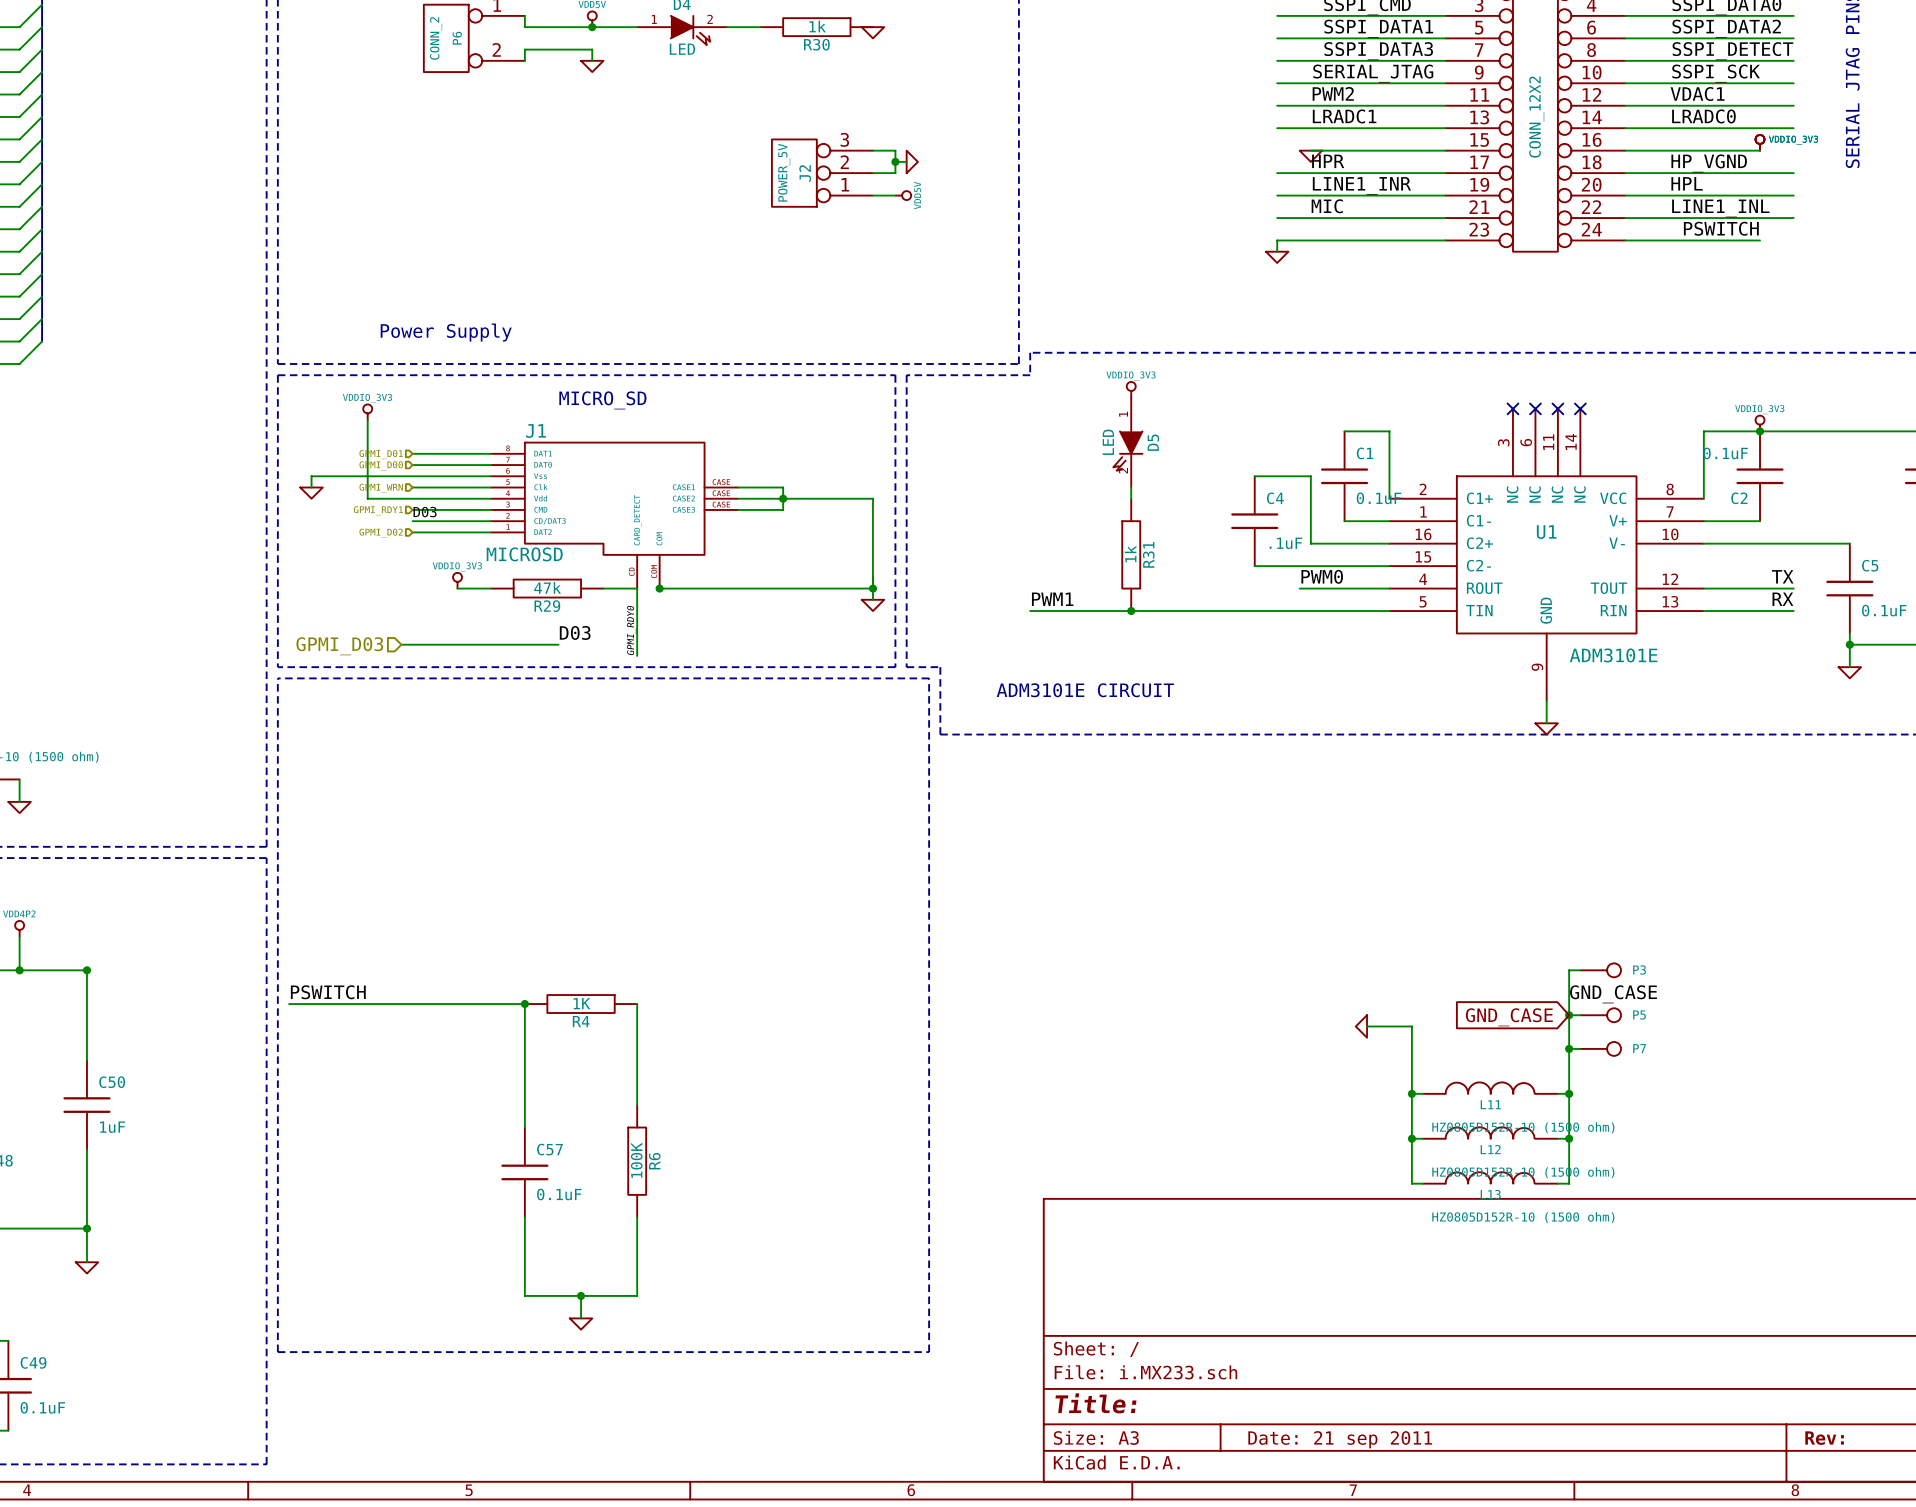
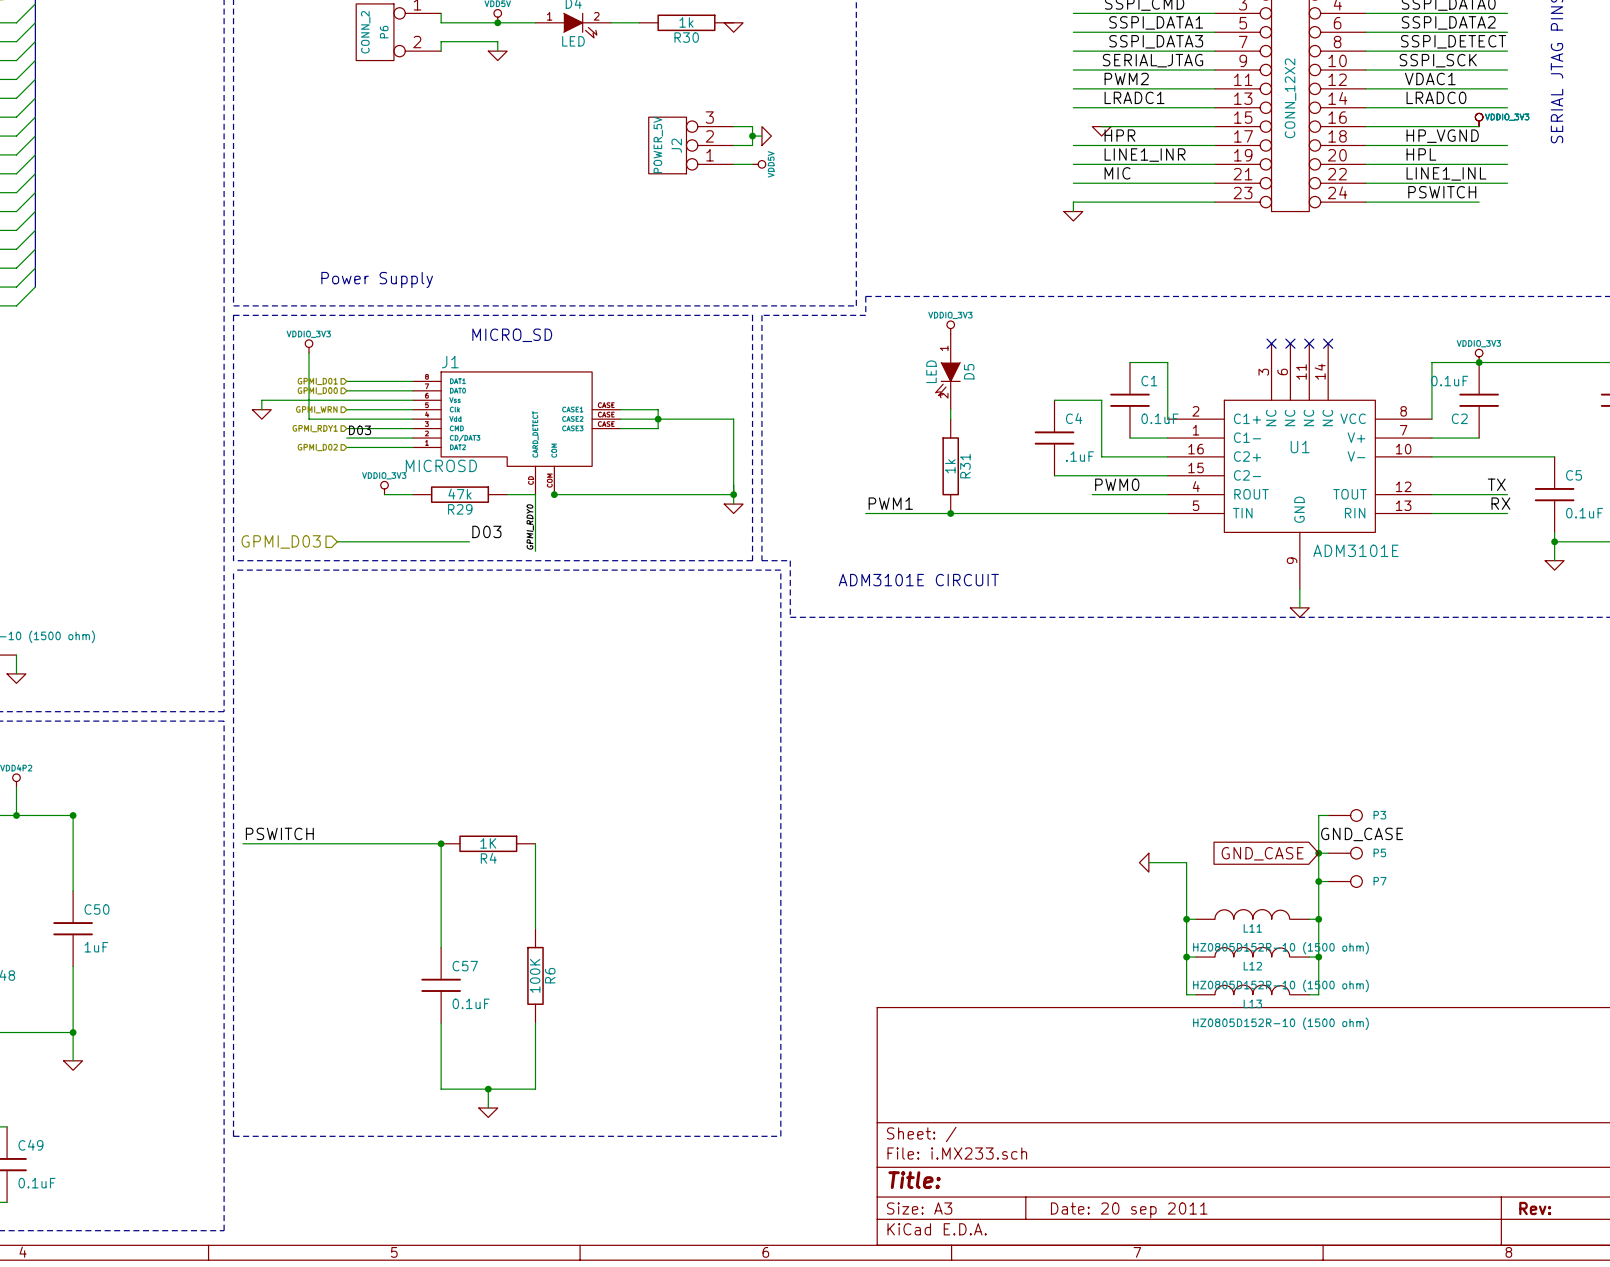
title block: Date: 21 sep 2011 (1340, 1439) -> Date: 20 sep 2011 (1129, 1210)

